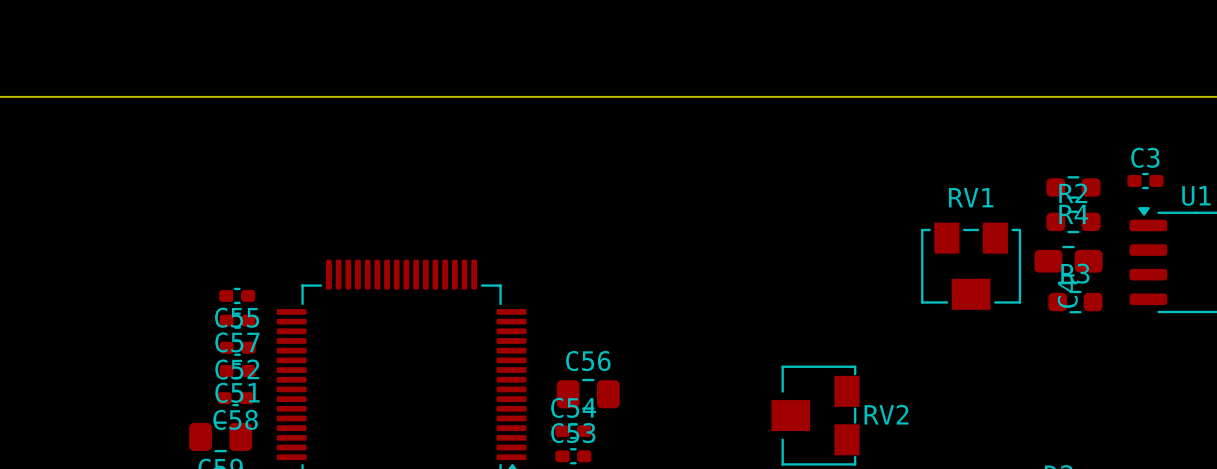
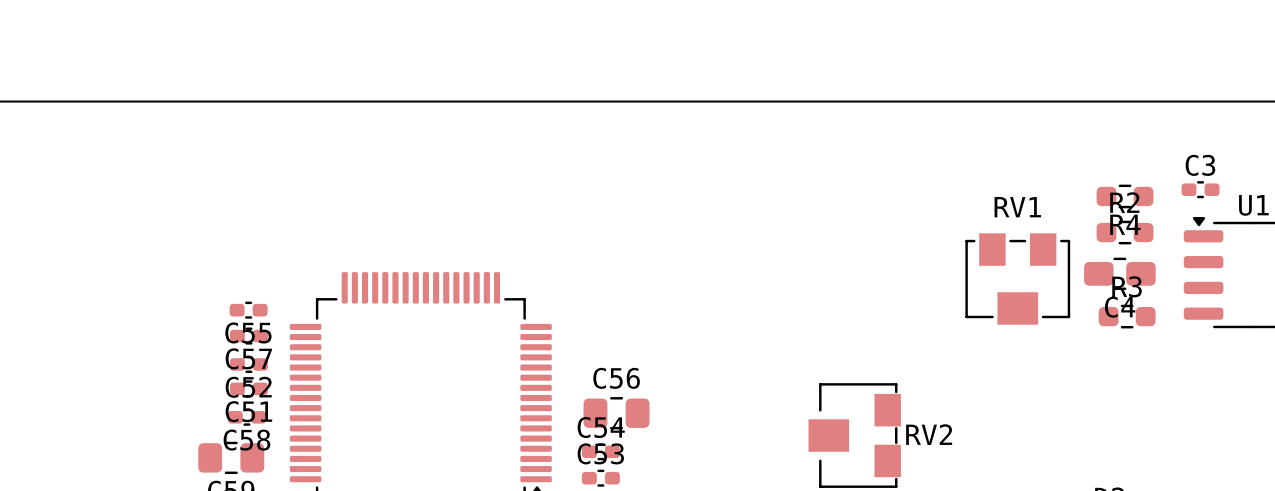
C4 name rotation: 0° (1067, 293) -> 90° clockwise (1120, 307)

